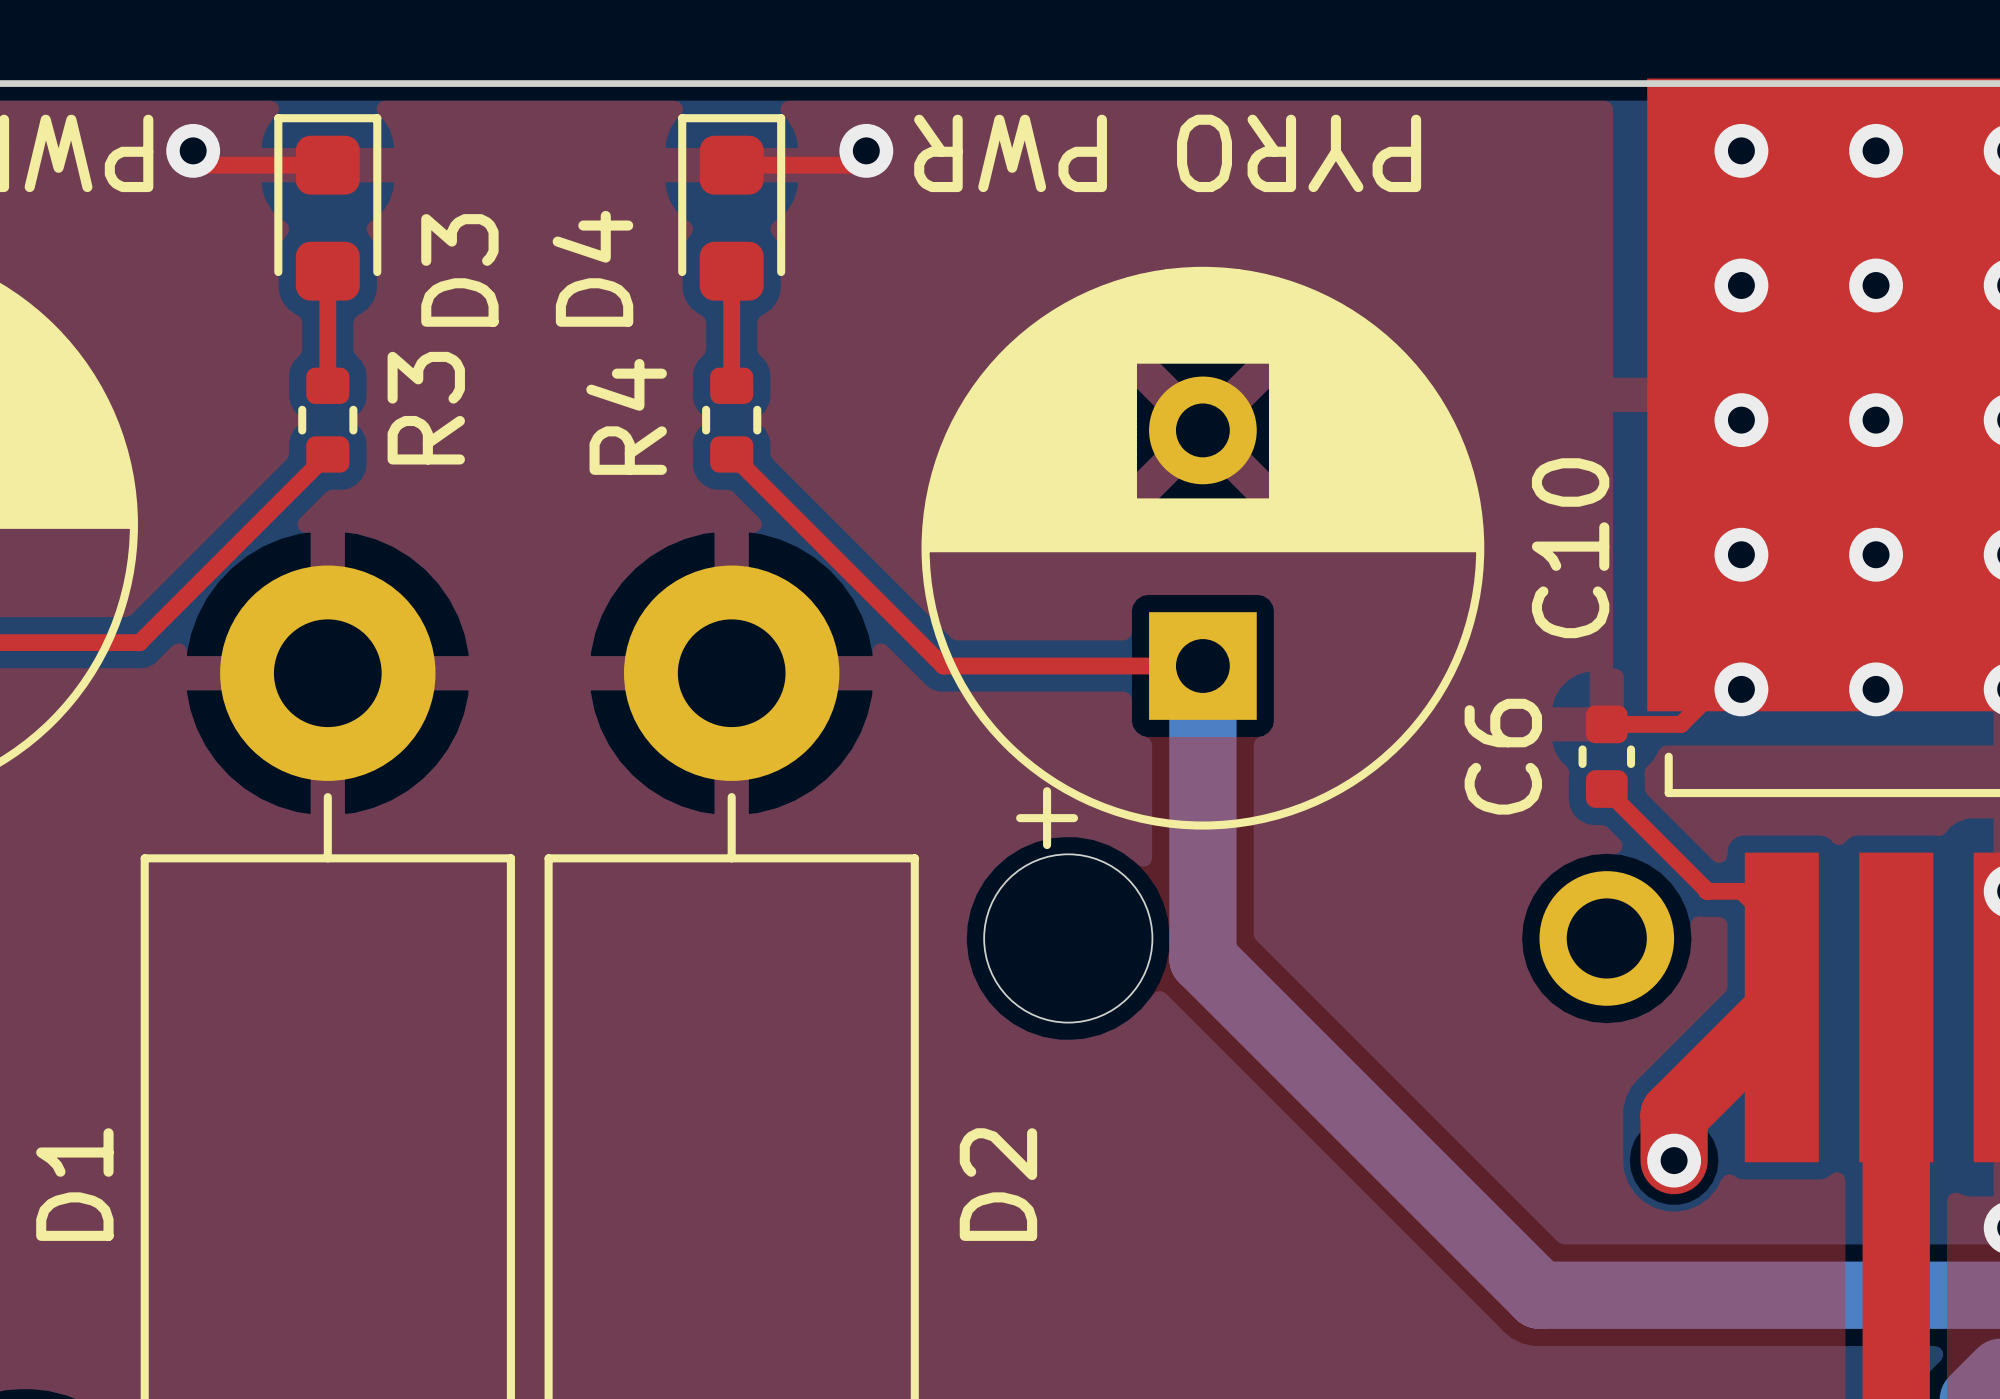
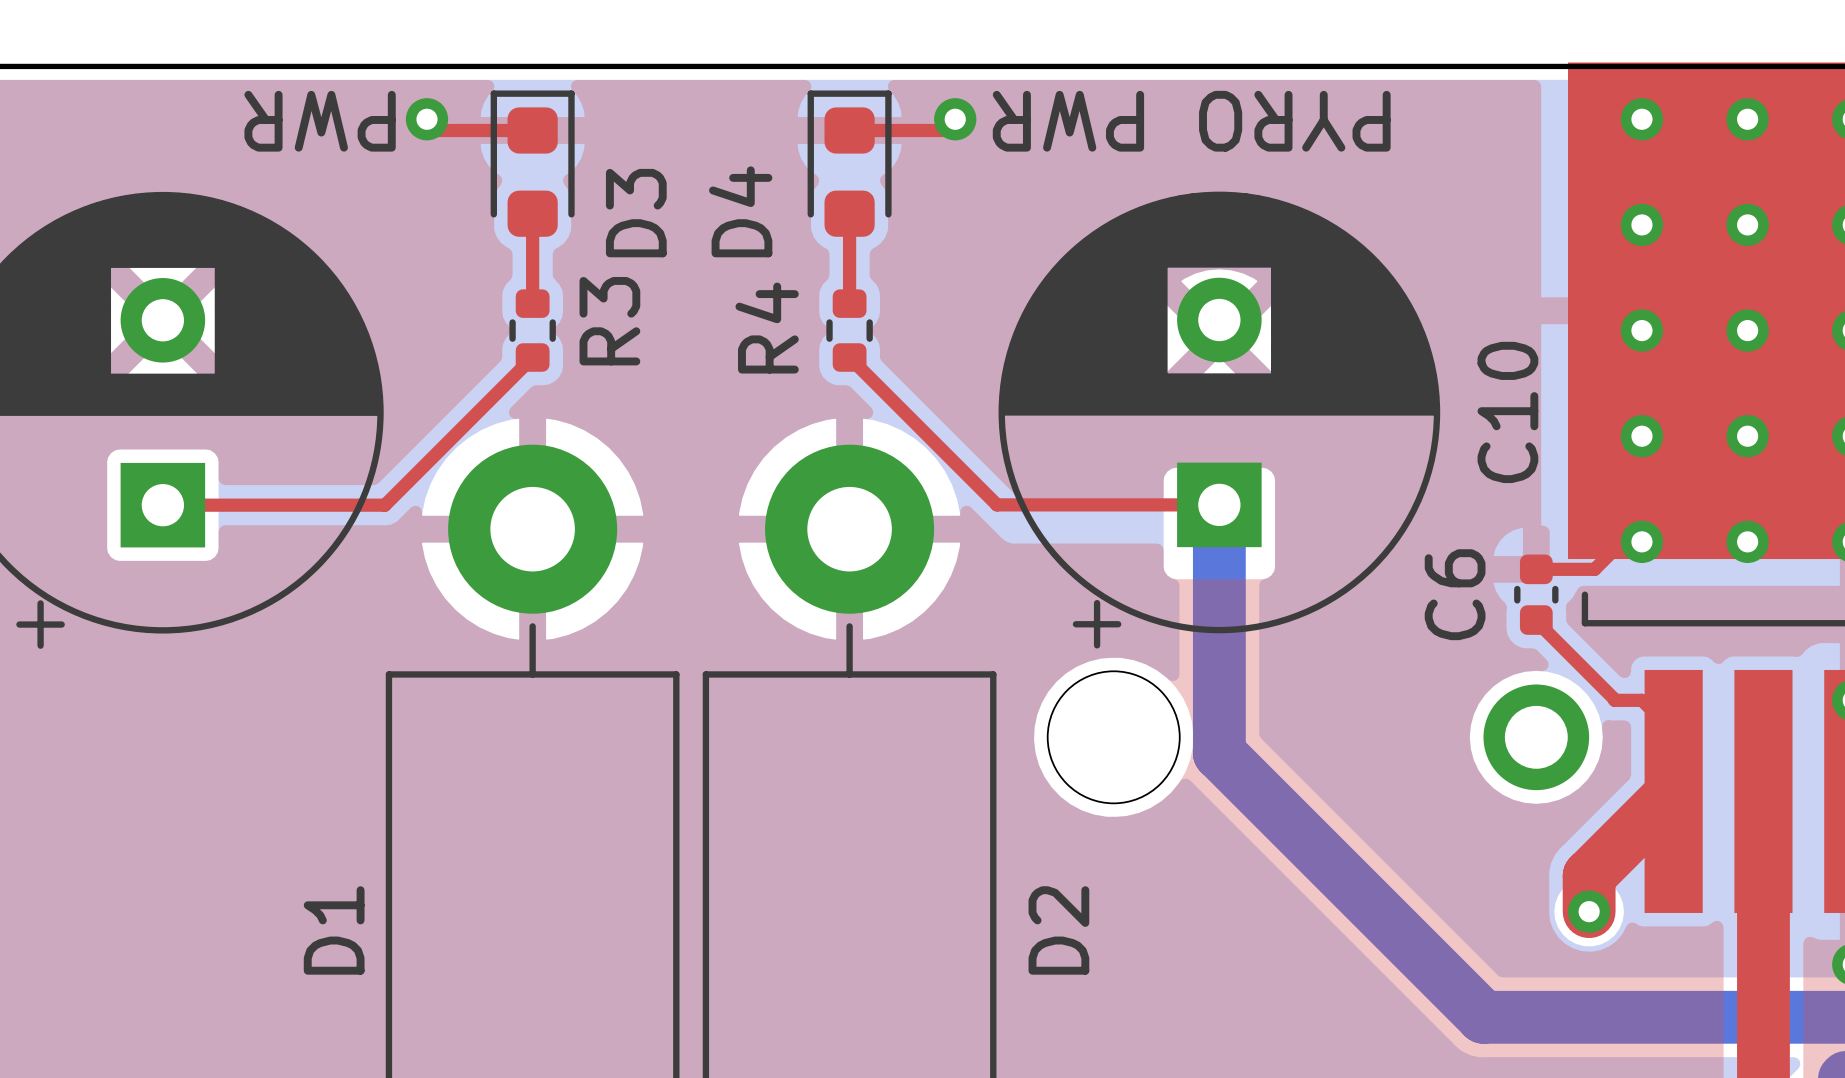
C10 position: (1202, 557) -> (1219, 420)
top track: (919, 642) (943, 666) (1202, 666) -> (996, 504) (1219, 504)

